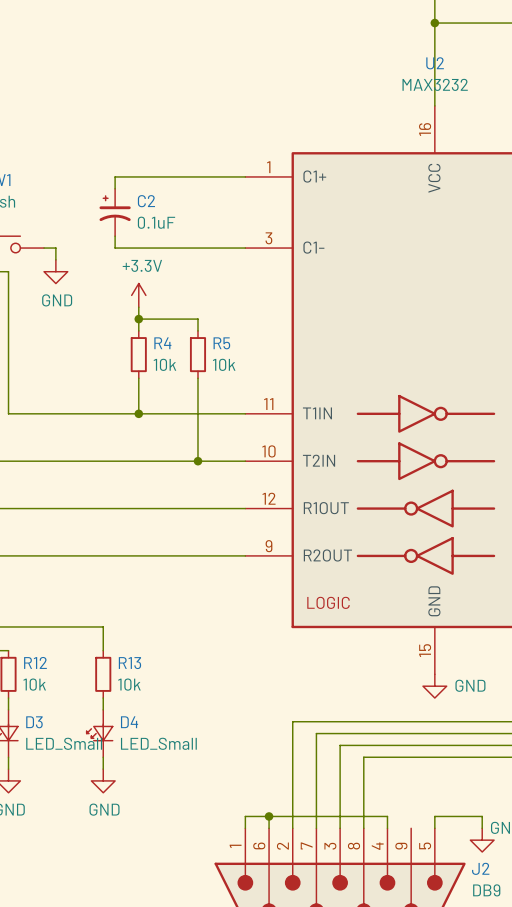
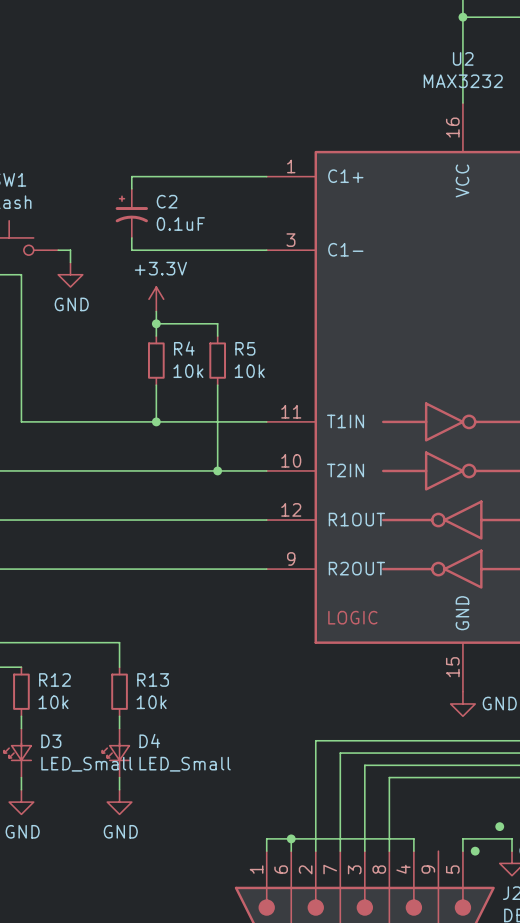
junction: none -> (499, 826)
junction: none -> (475, 851)

